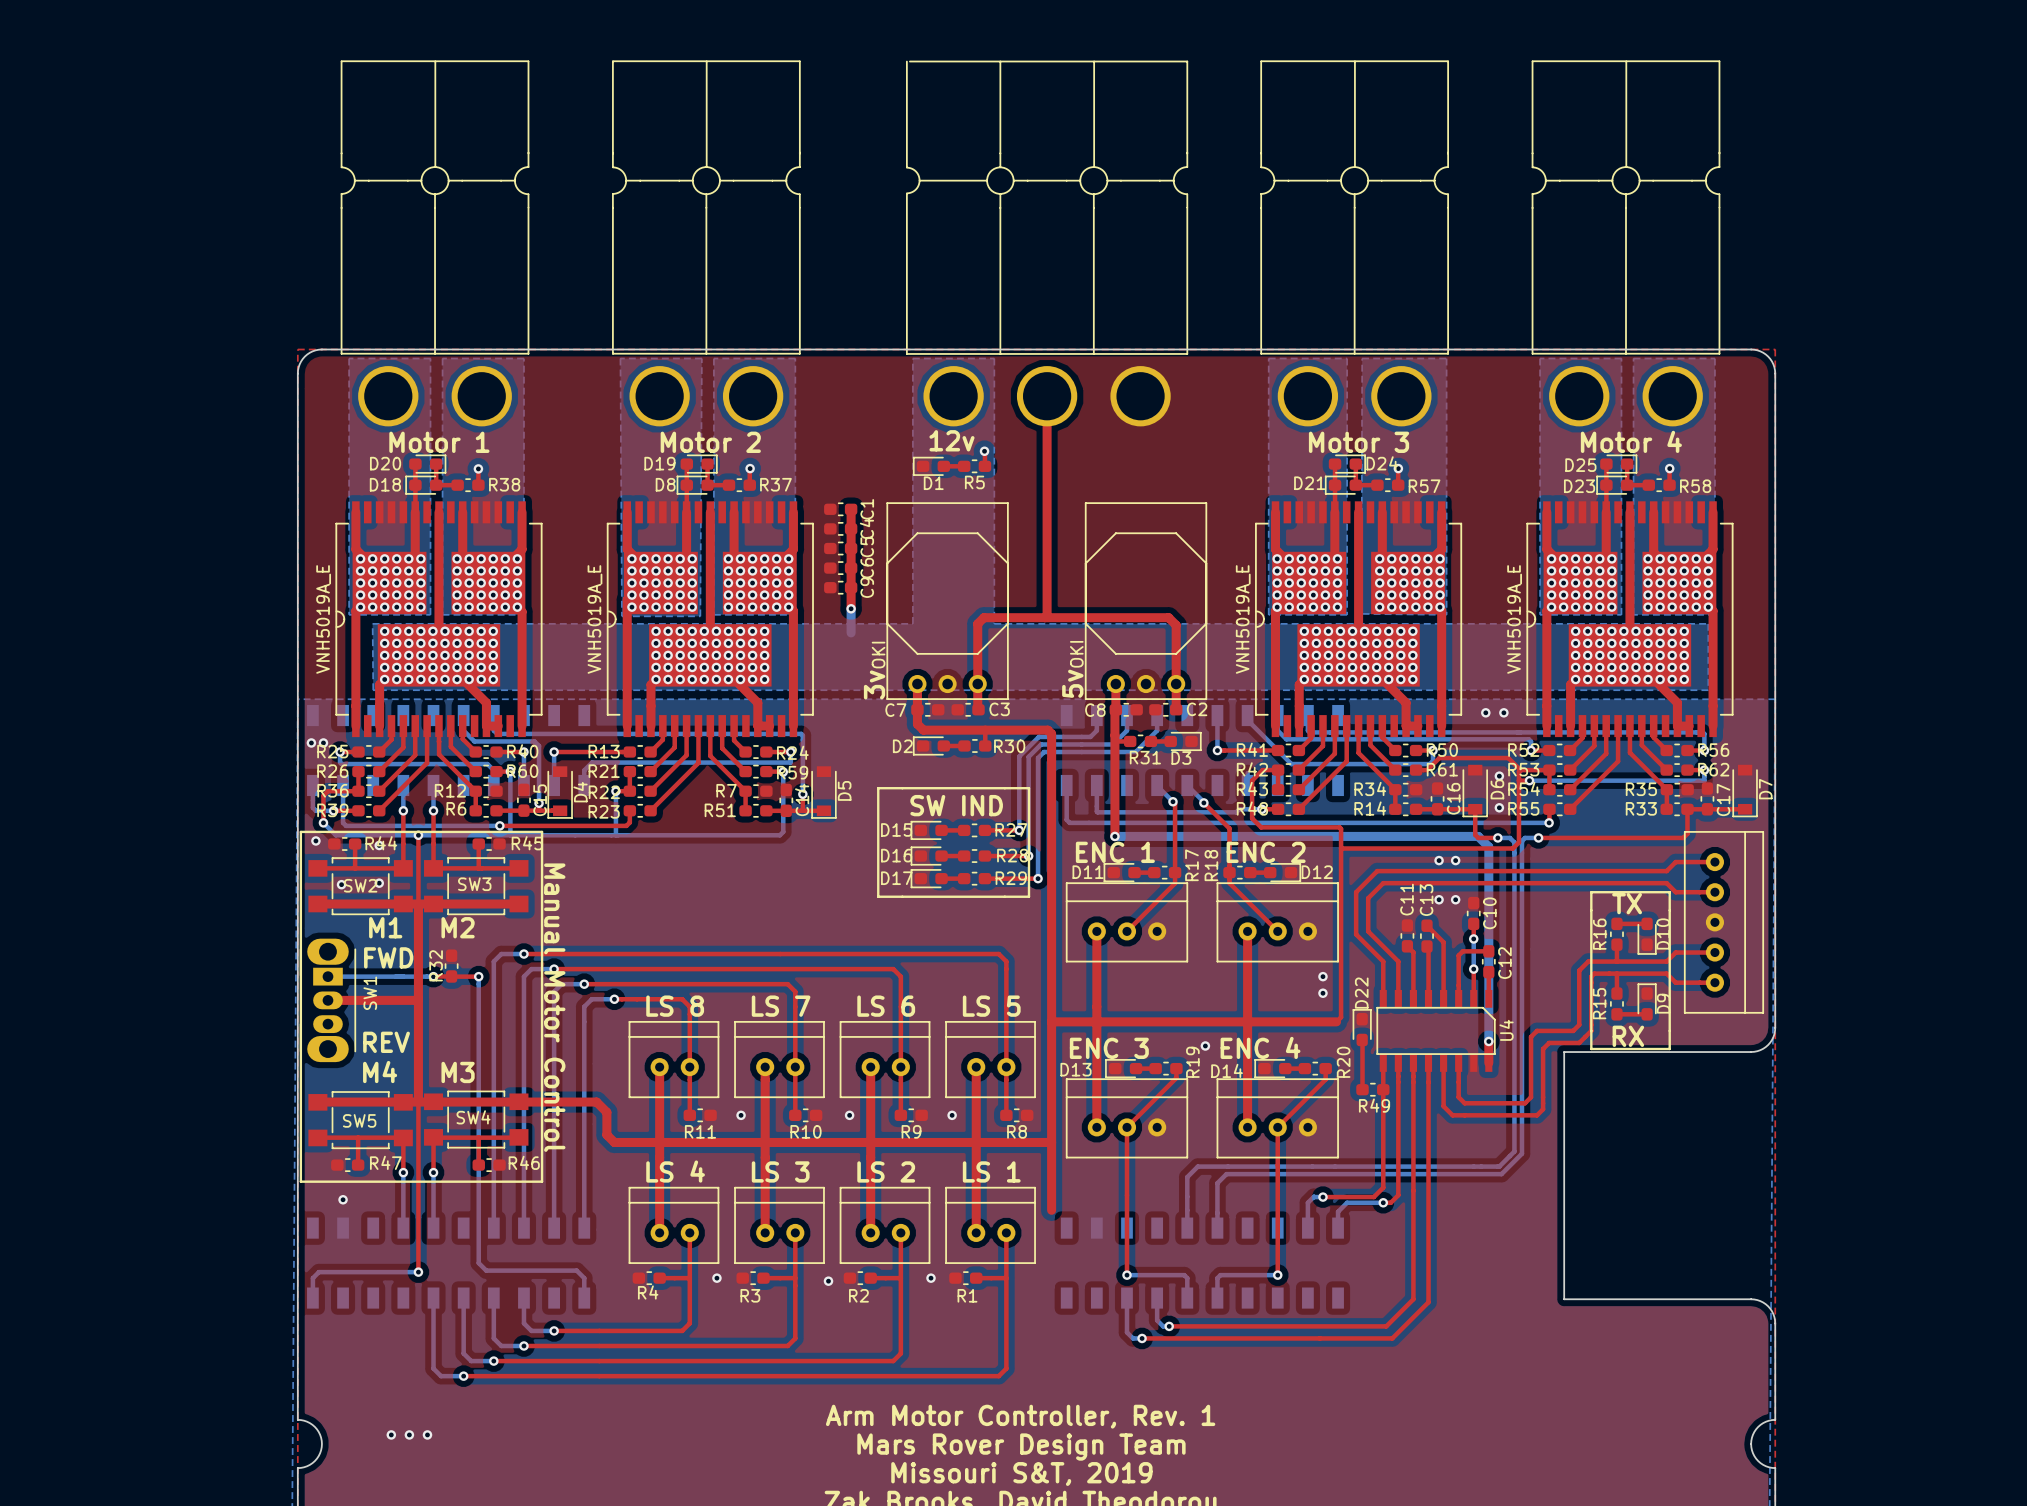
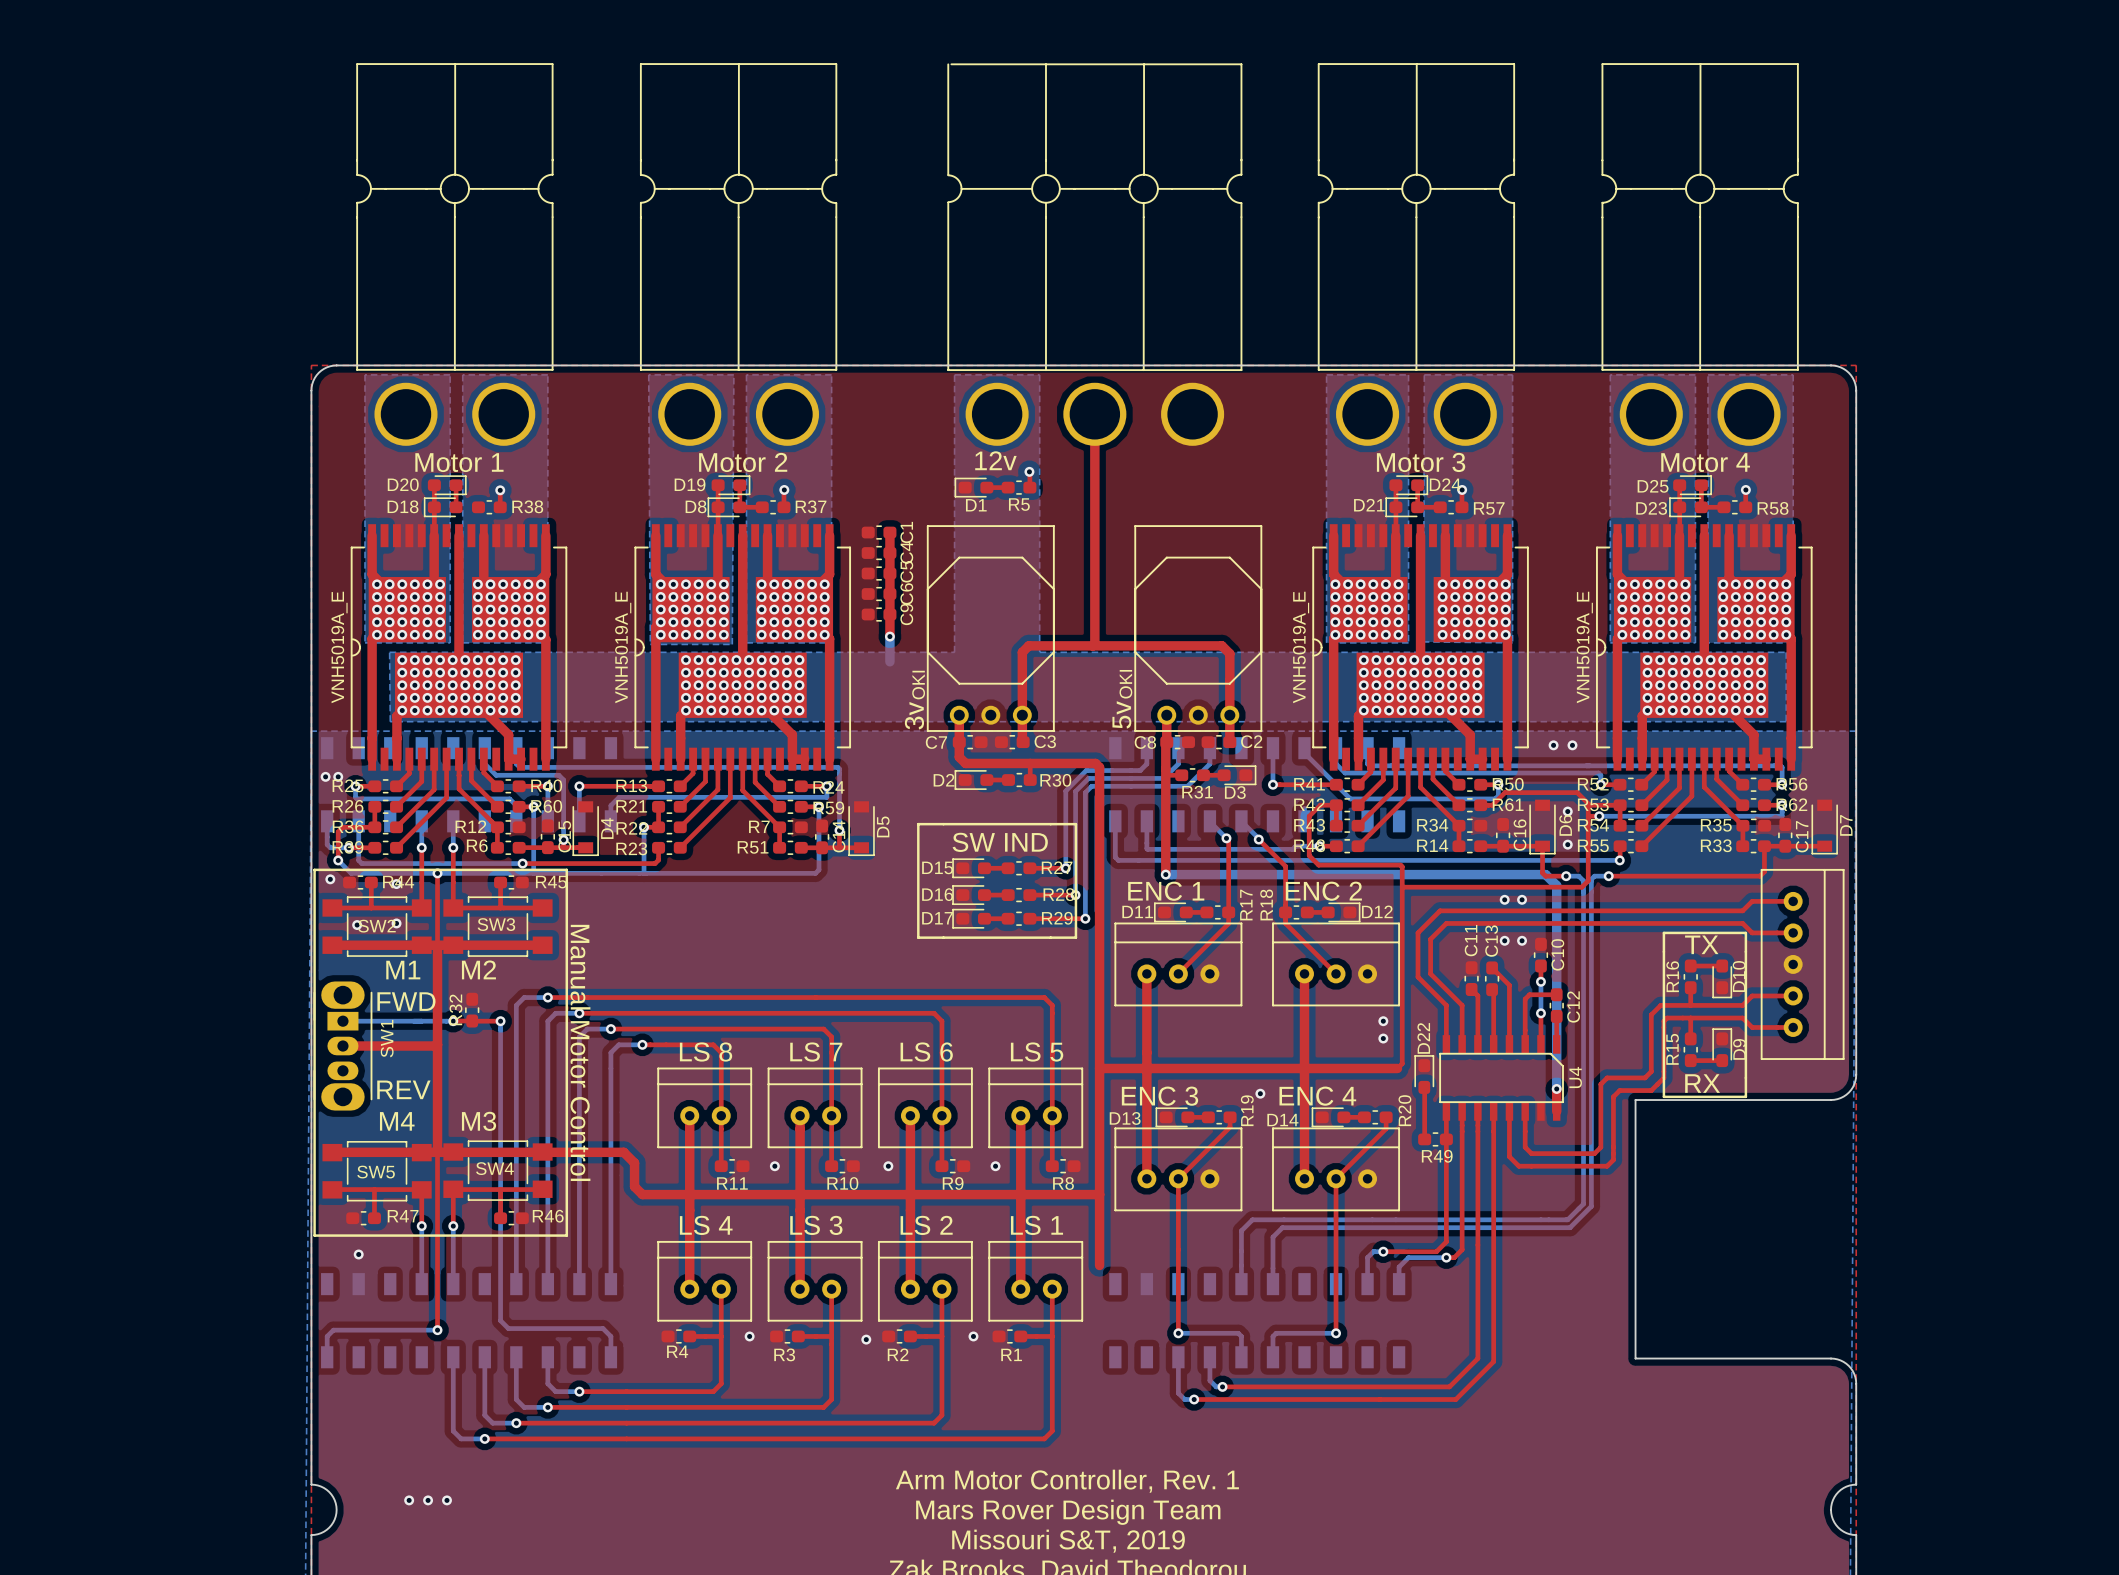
top track: (436, 485) (457, 485) -> none

